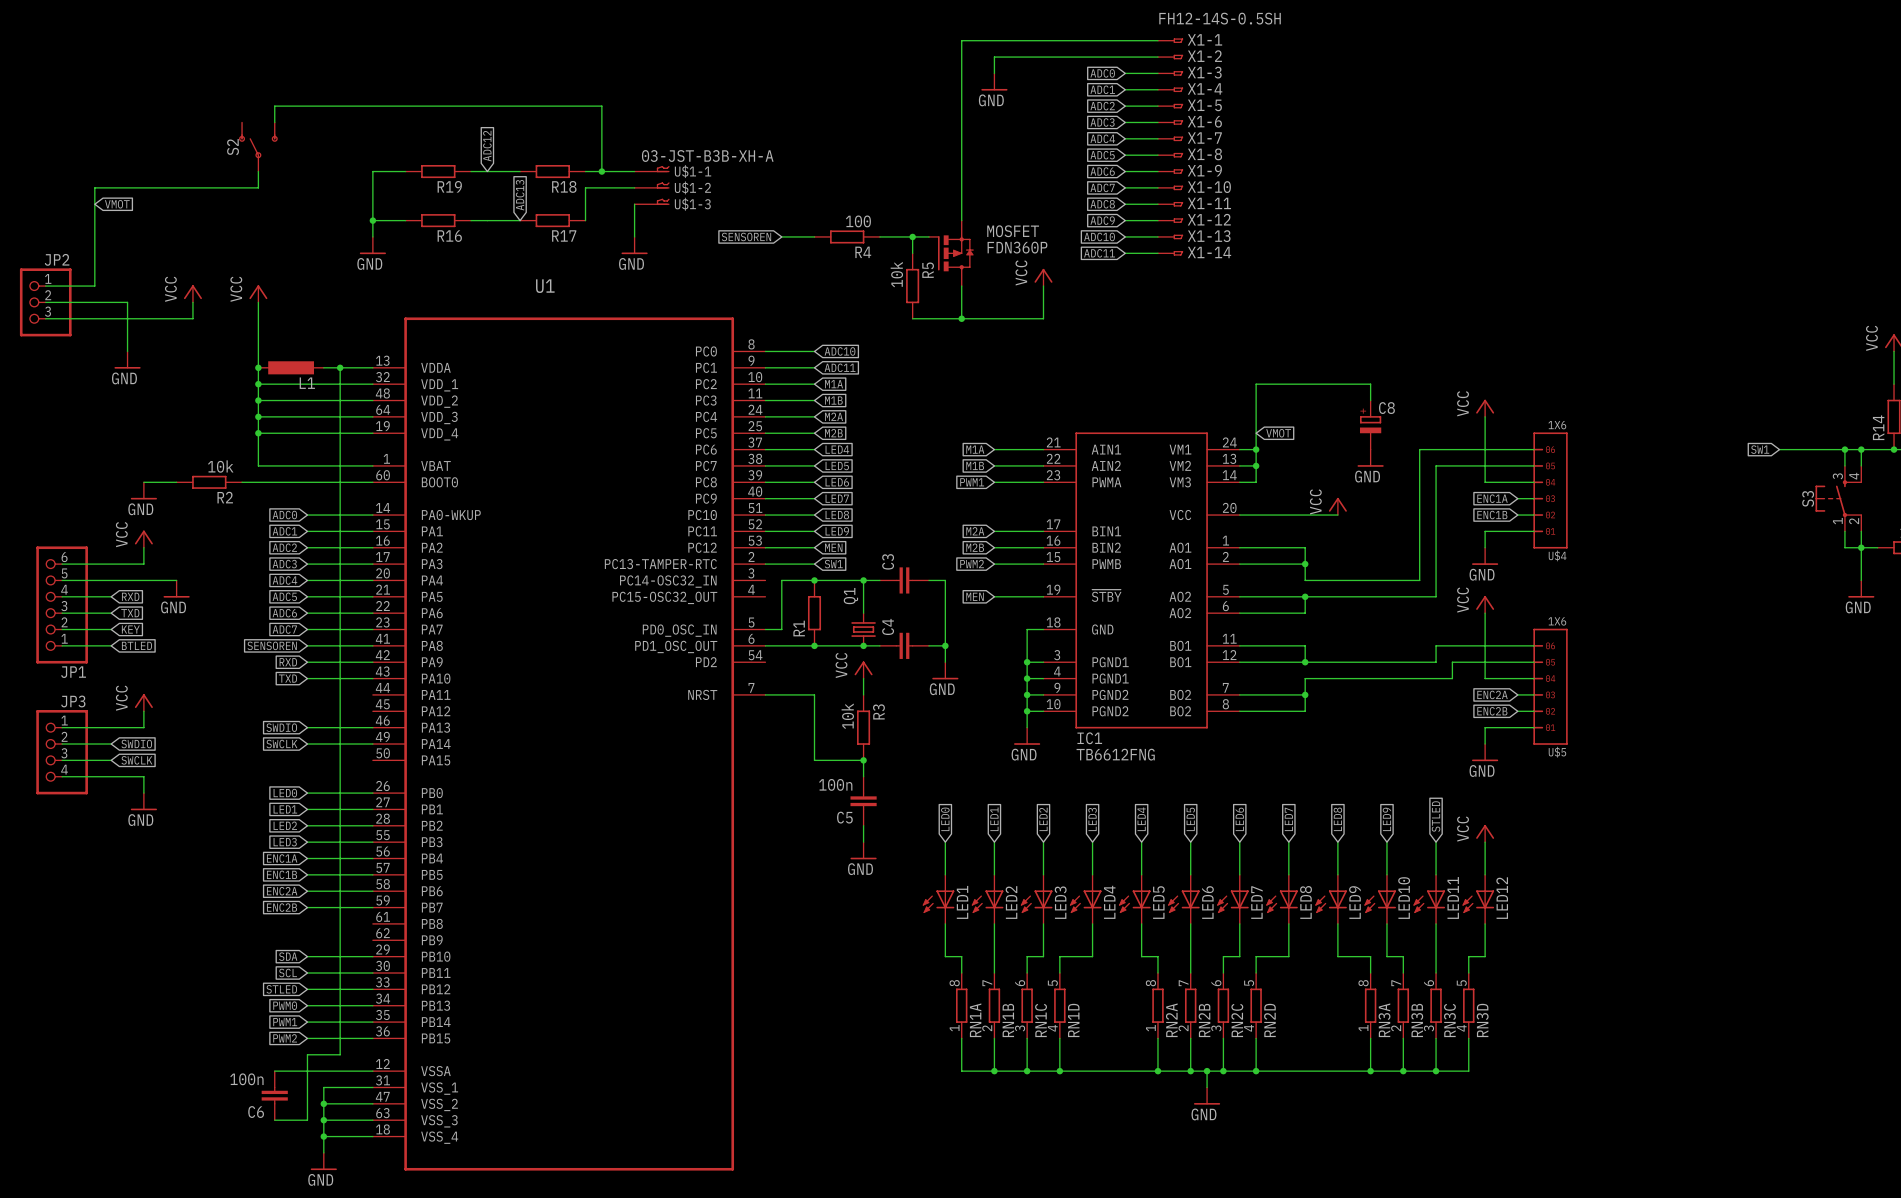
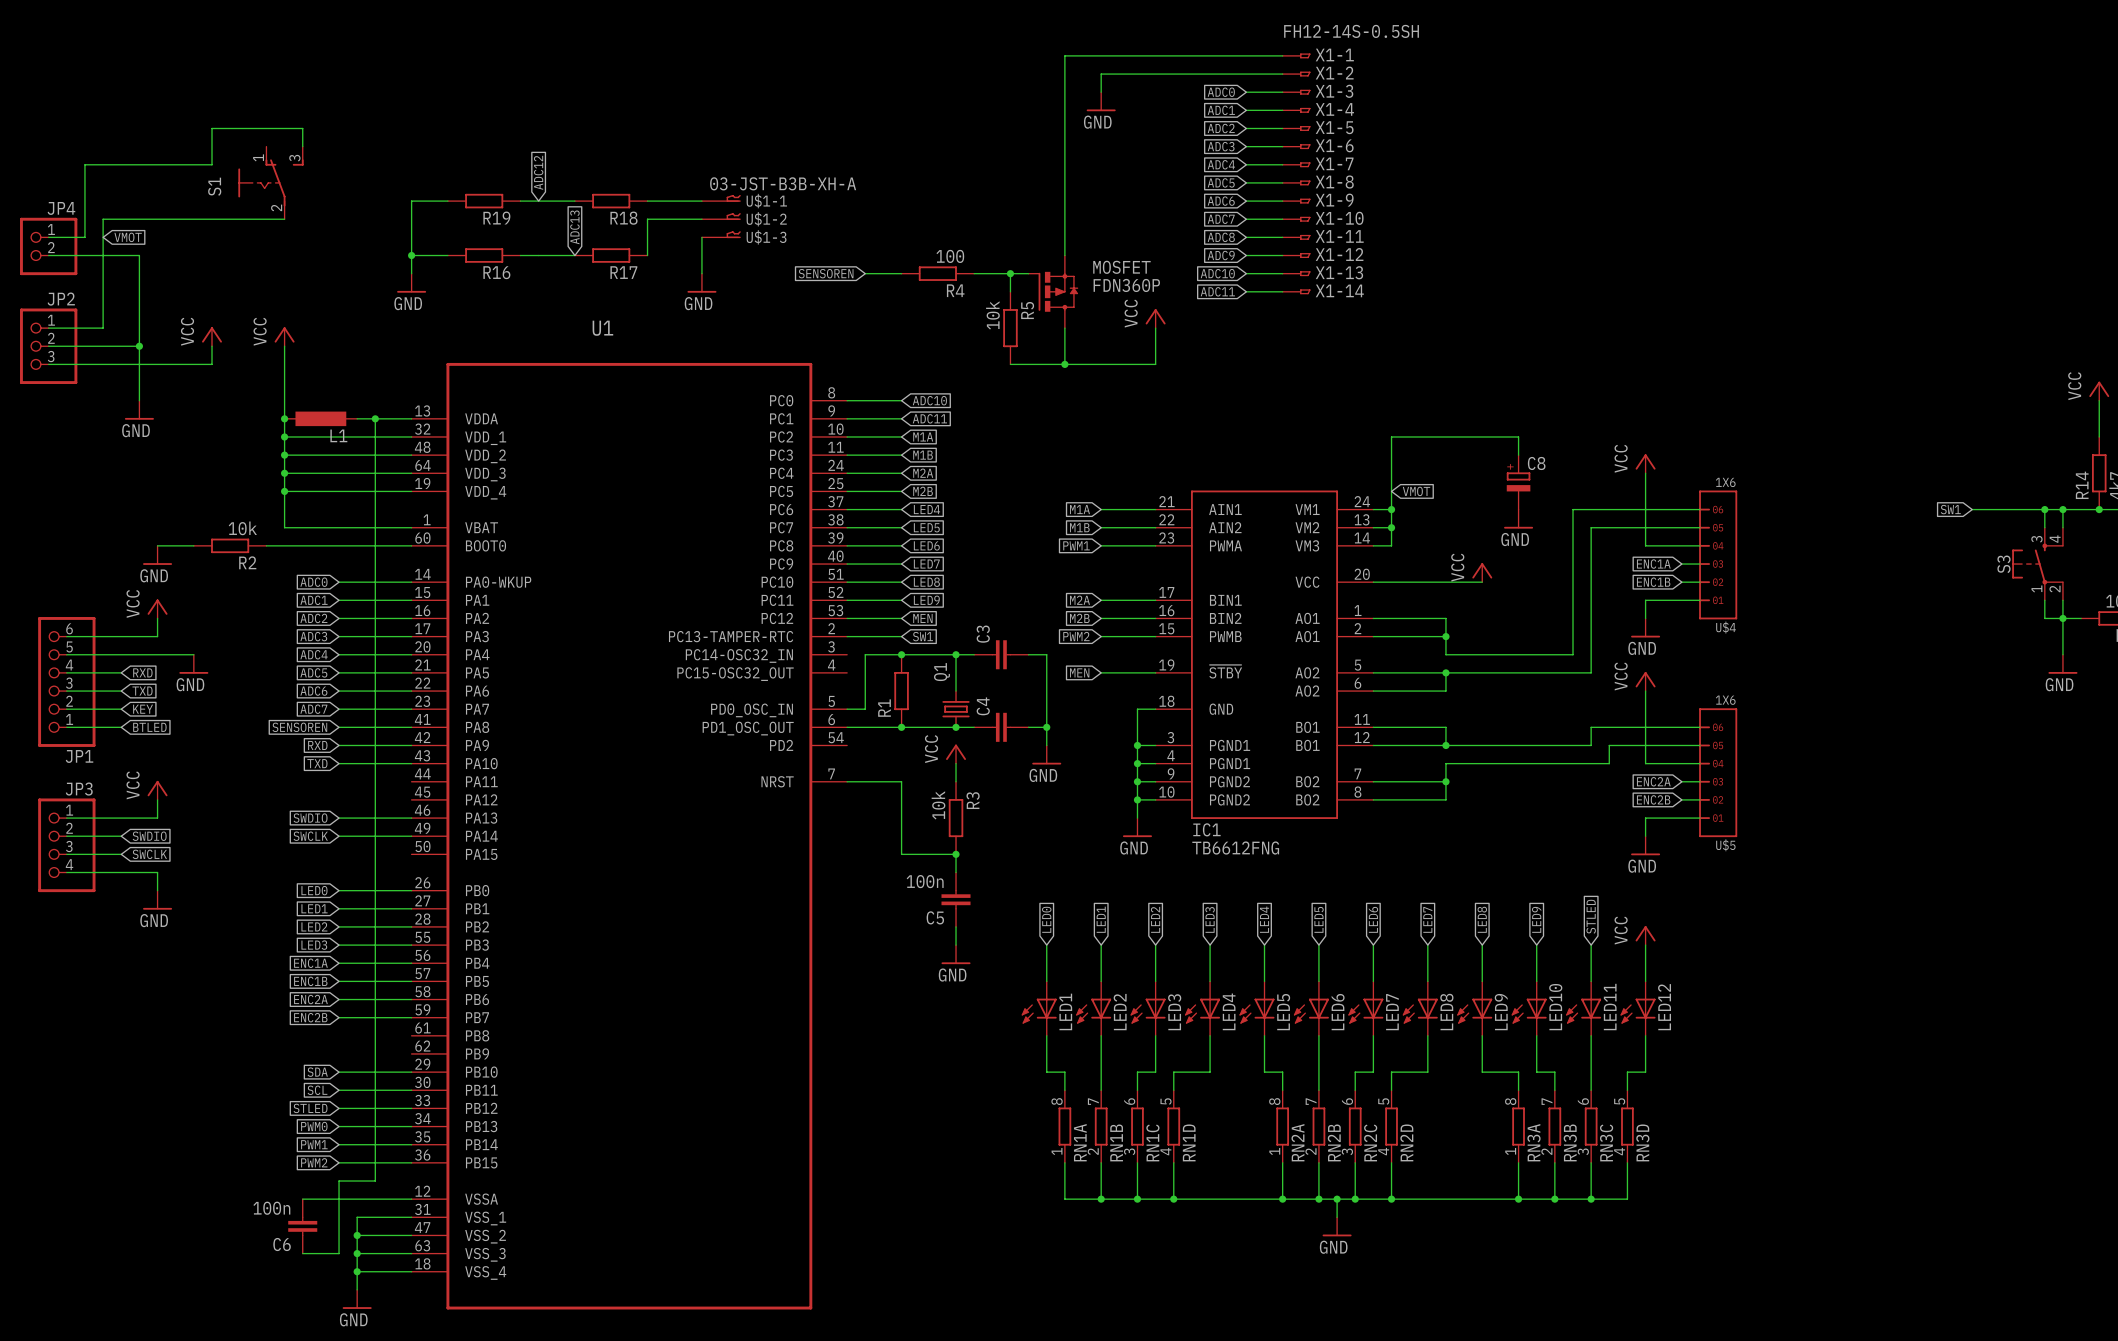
wire: (274, 106) (601, 106) (601, 171) -> (302, 128) (212, 128) (212, 164) (84, 164) (84, 237) (48, 237)
S2: (258, 147) -> none
S1: none -> (270, 182)
junction: (601, 171) -> none
JP4: none -> (48, 246)
wire: none -> (48, 255) (139, 255) (139, 346)
junction: none -> (139, 346)

